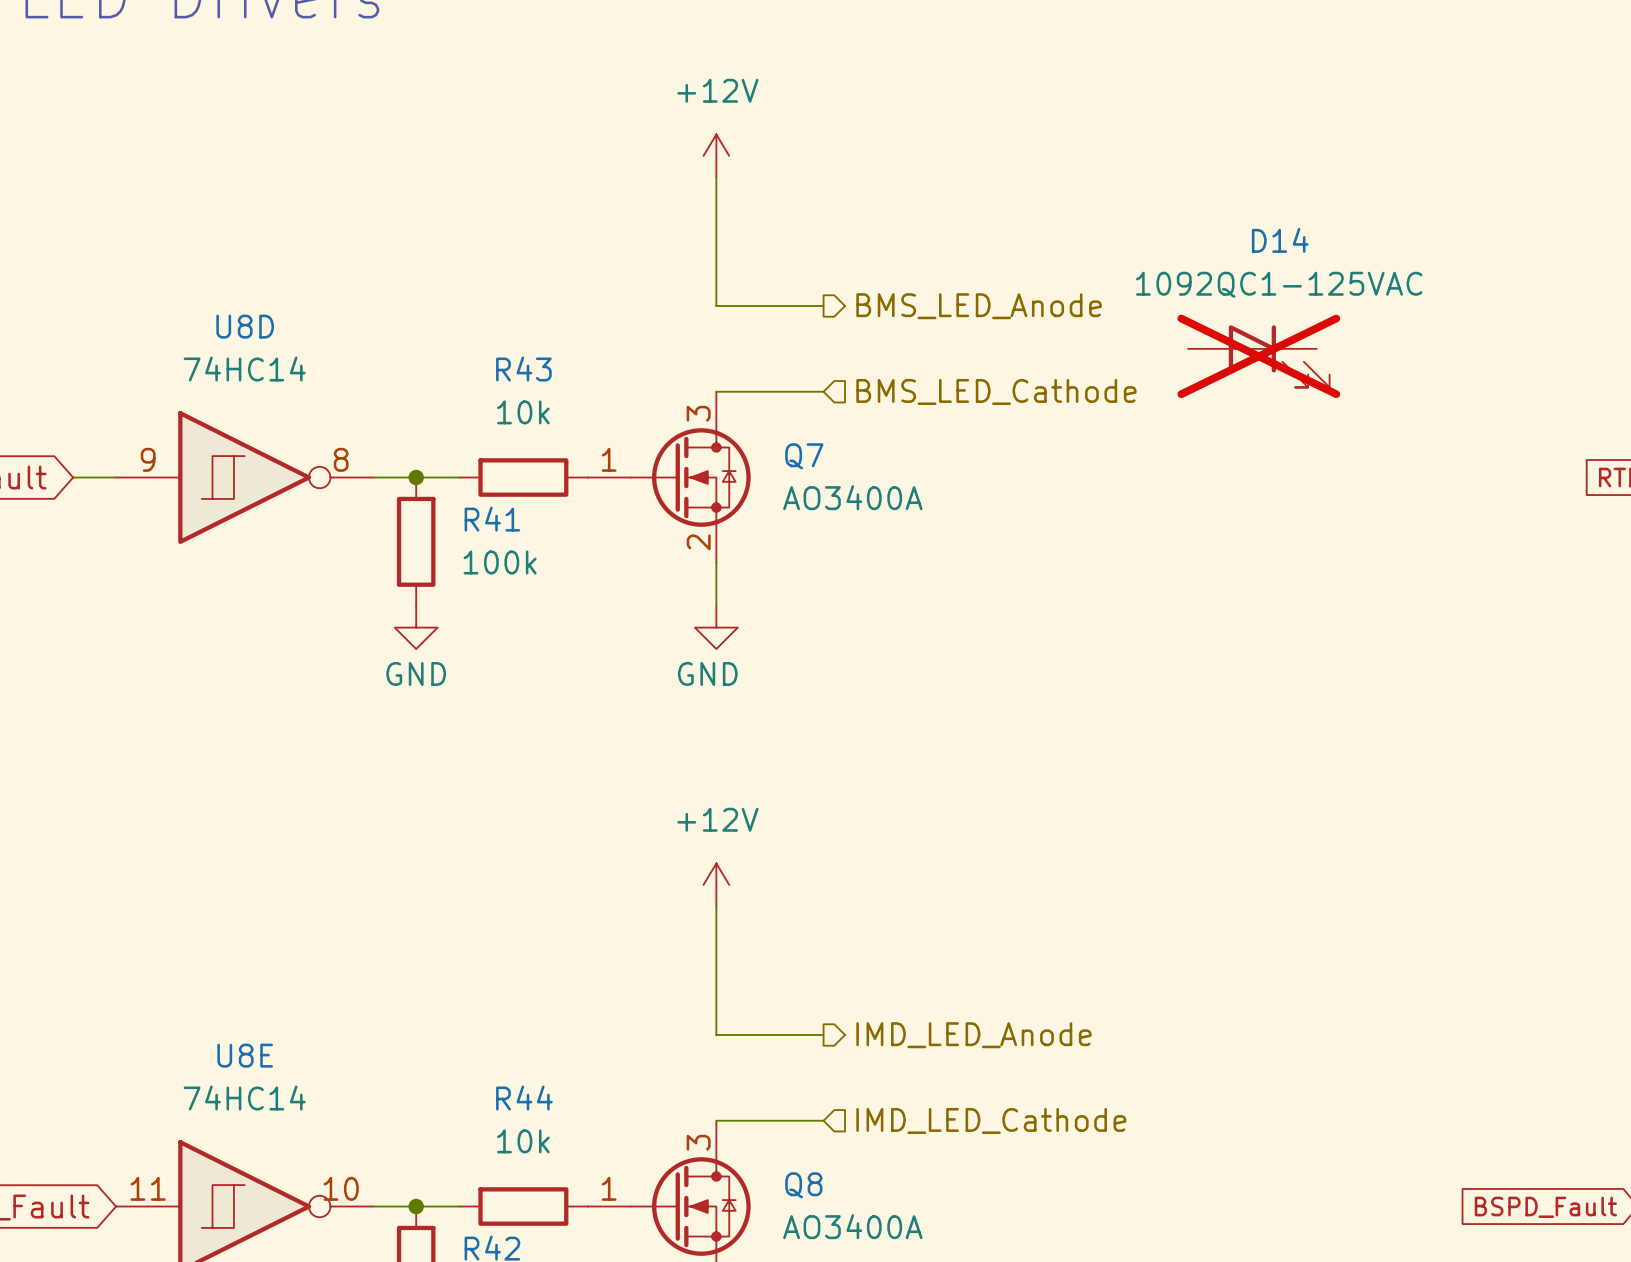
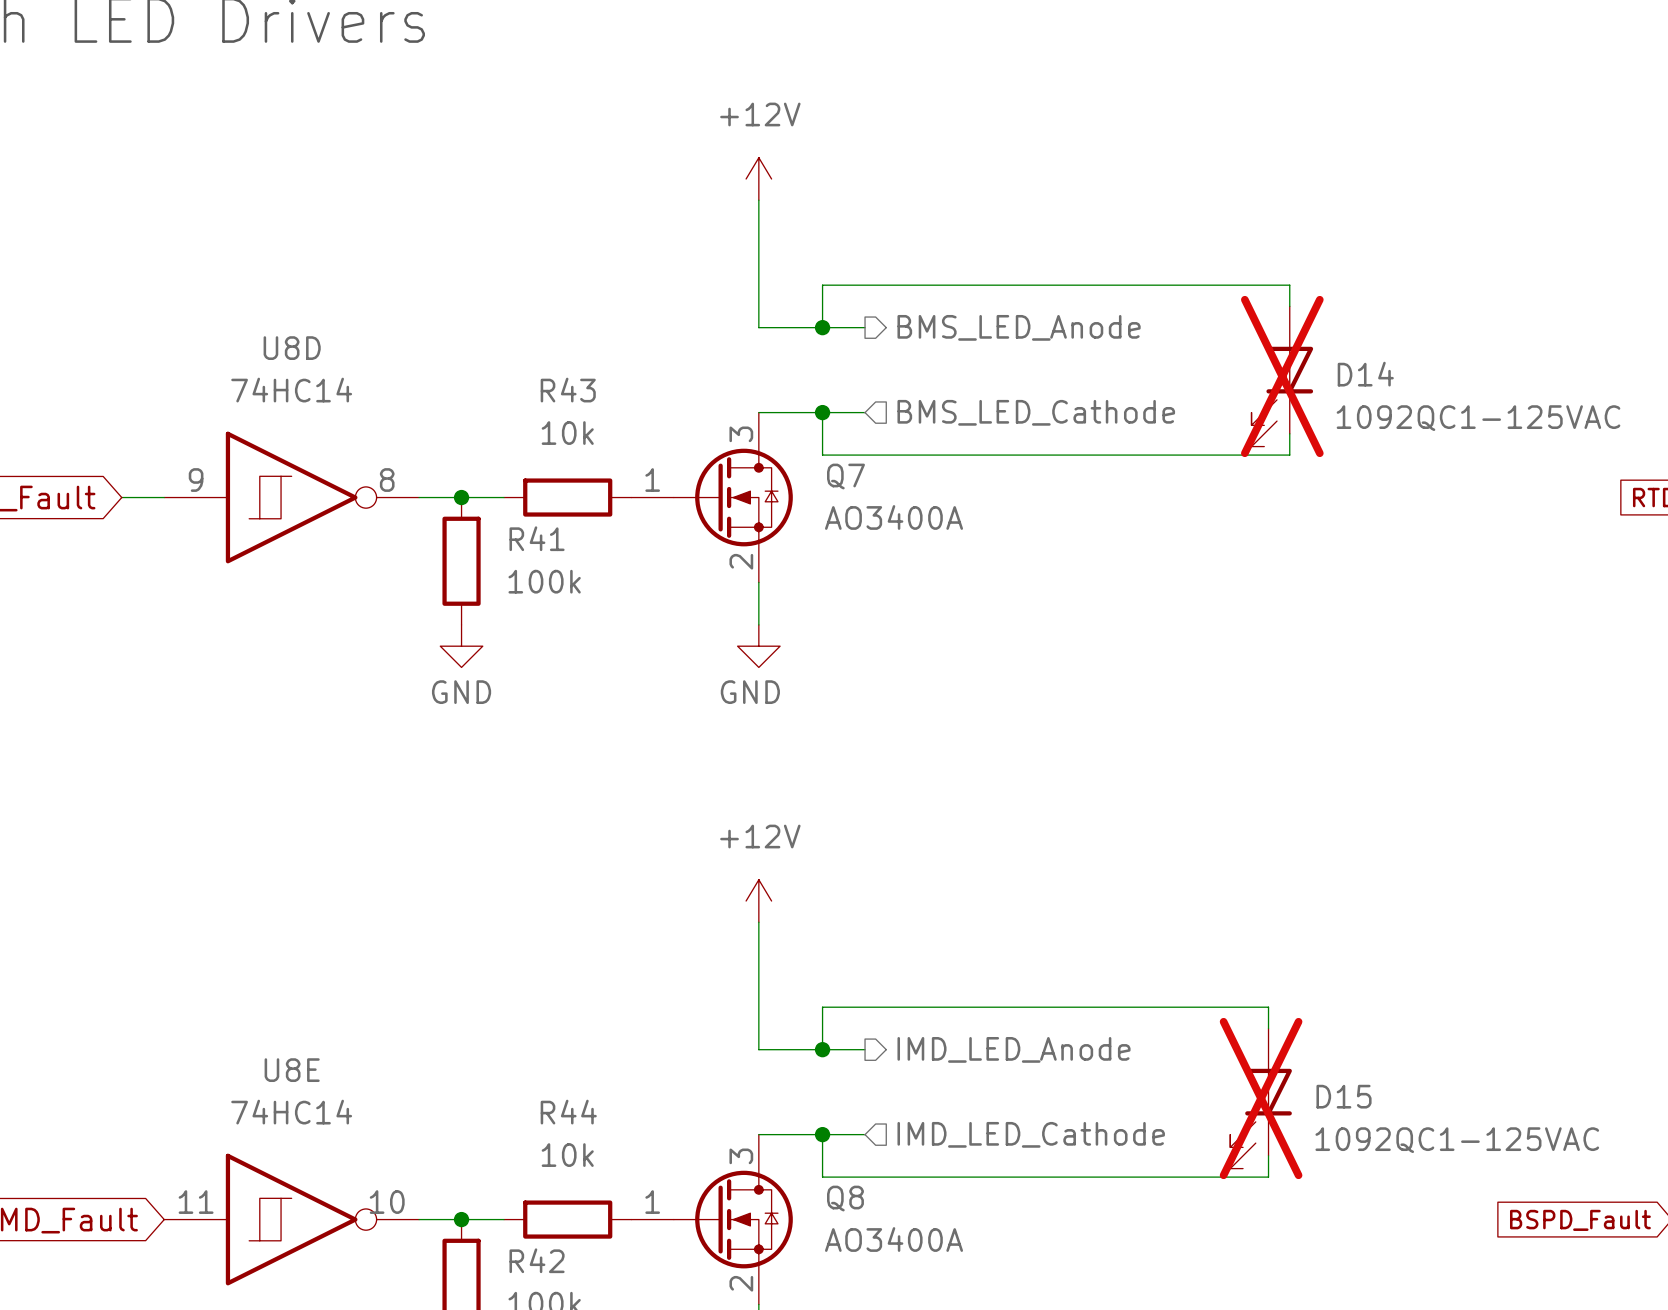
D14 name position: D14 (1280, 240) -> D14 (1365, 374)
wire: none -> (1289, 306) (1289, 285) (822, 285) (822, 327)
D14 value position: 1092QC1-125VAC (1279, 284) -> 1092QC1-125VAC (1478, 418)
junction: none -> (822, 327)
D14 rotation: 0° (1279, 356) -> 90° clockwise (1282, 396)
wire: none -> (822, 412) (822, 455) (1289, 455) (1289, 433)
junction: none -> (822, 412)
wire: none -> (1268, 1028) (1268, 1007) (822, 1007) (822, 1049)
junction: none -> (822, 1049)
D15: none -> 1092QC1-125VAC (1261, 1098)
wire: none -> (822, 1134) (822, 1177) (1268, 1177) (1268, 1155)
junction: none -> (822, 1134)

